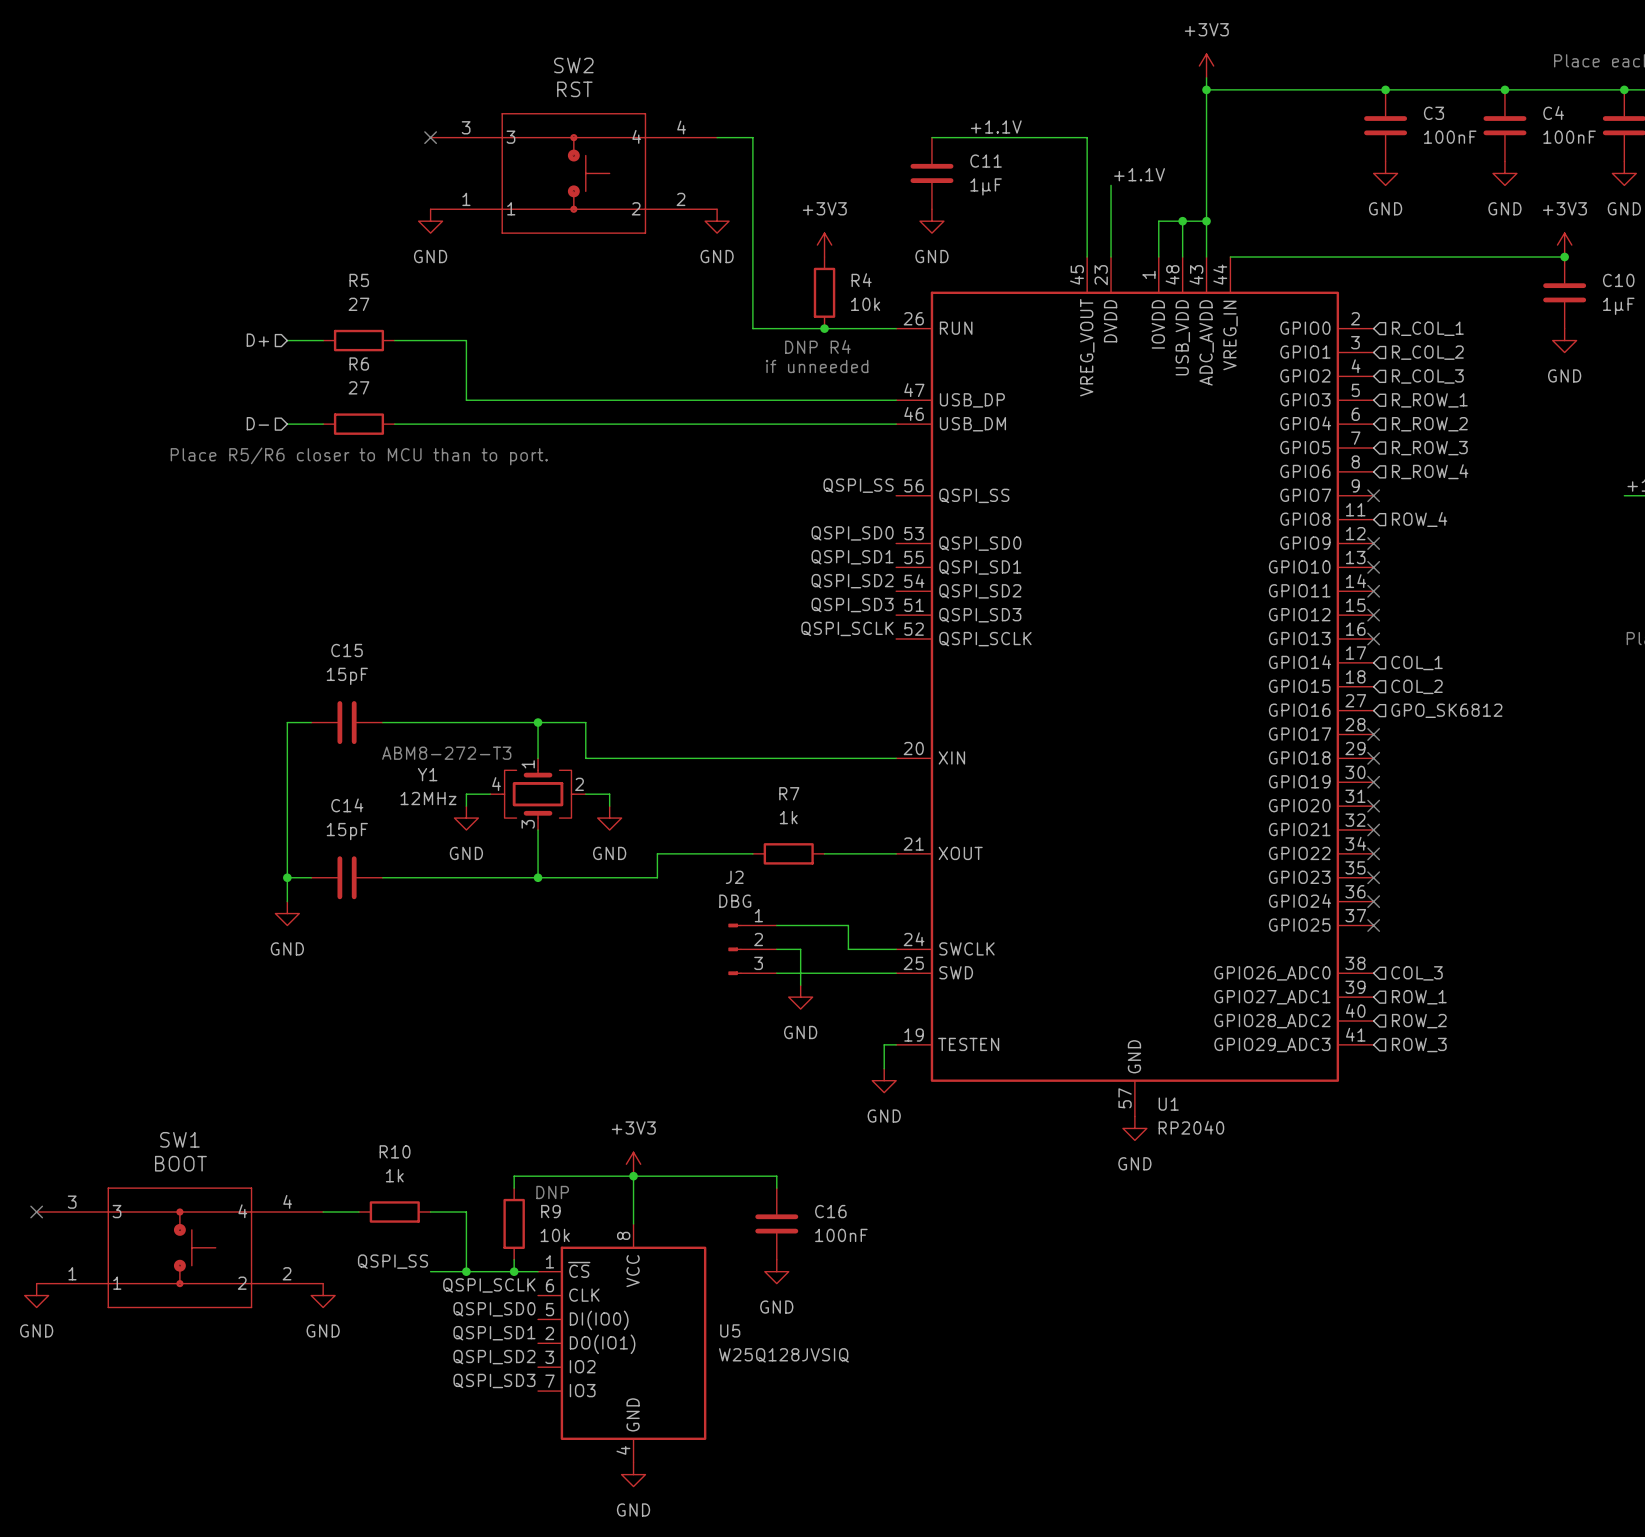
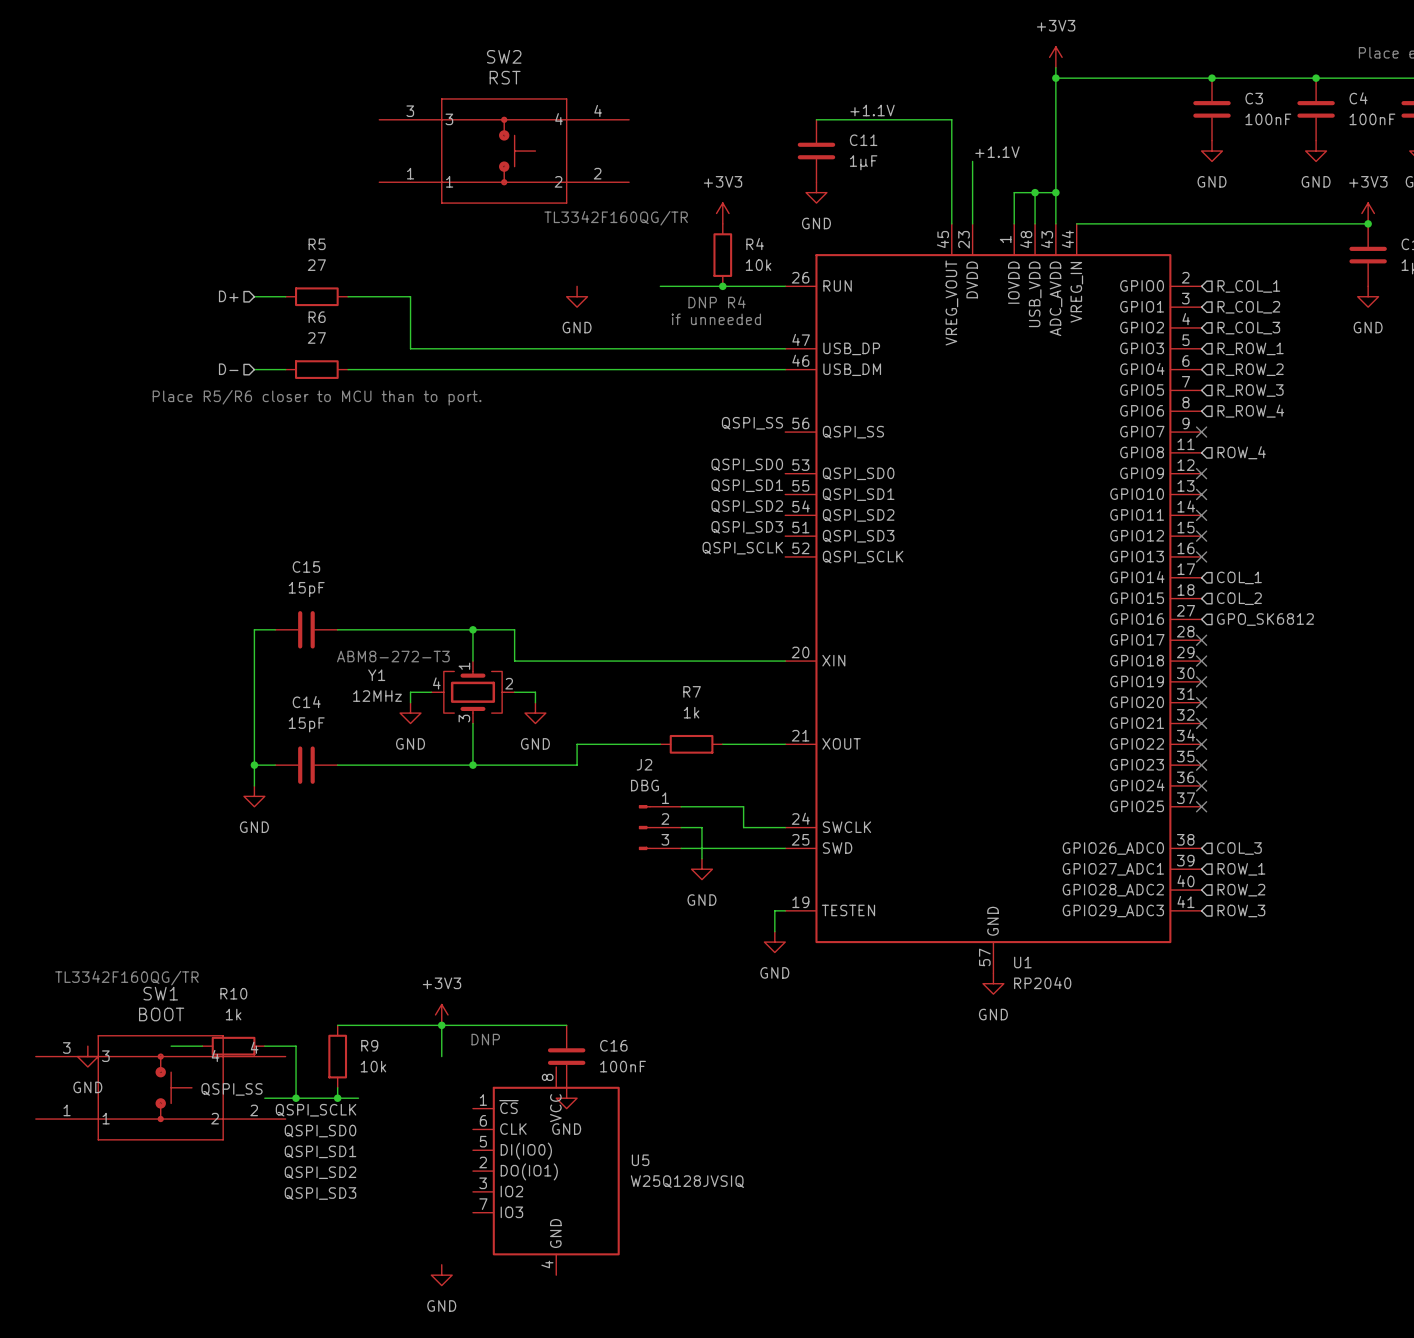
no-connect mark: (430, 137) -> none
wire: (717, 137) (752, 137) (752, 328) -> none
power symbol: GND (430, 221) -> none
power symbol: GND (717, 221) -> none
text: none -> TL3342F160QG/TR (616, 218)
power symbol: none -> GND (577, 296)
text: none -> TL3342F160QG/TR (126, 978)
power symbol position: +3V3 (633, 1164) -> +3V3 (441, 1014)
wire: none -> (441, 1025) (441, 1056)
junction: none -> (441, 1025)
wire: (514, 1176) (514, 1188) -> (452, 1025) (337, 1025)
wire: (633, 1176) (633, 1223) -> none
junction: (633, 1176) -> none
wire: (645, 1176) (776, 1176) (776, 1188) -> none
no-connect mark: (36, 1211) -> none
wire: (323, 1211) (358, 1211) -> (171, 1046) (202, 1046)
R10 position: (394, 1211) -> (233, 1046)
wire: (430, 1211) (466, 1211) (466, 1271) -> (264, 1046) (296, 1046) (296, 1098)
R9 position: (514, 1223) -> (337, 1056)
C16 position: (776, 1223) -> (566, 1056)
junction: none -> (296, 1098)
junction: none -> (337, 1098)
wire: (514, 1259) (514, 1271) -> (337, 1087) (337, 1098)
power symbol: none -> GND (566, 1098)
label position: QSPI_SS (392, 1261) -> QSPI_SS (232, 1089)
wire: (430, 1271) (538, 1271) -> (264, 1098) (358, 1098)
junction: (466, 1271) -> none
junction: (514, 1271) -> none
power symbol: GND (776, 1271) -> none
label position: QSPI_SCLK (489, 1285) -> QSPI_SCLK (316, 1110)
power symbol position: GND (36, 1295) -> GND (87, 1056)
power symbol: GND (323, 1295) -> none
label position: QSPI_SD0 (494, 1309) -> QSPI_SD0 (320, 1131)
label position: QSPI_SD1 (494, 1333) -> QSPI_SD1 (320, 1151)
label position: QSPI_SD2 (494, 1357) -> QSPI_SD2 (320, 1172)
label position: QSPI_SD3 (494, 1380) -> QSPI_SD3 (320, 1193)
power symbol: none -> GND (441, 1275)
power symbol: GND (633, 1474) -> none

